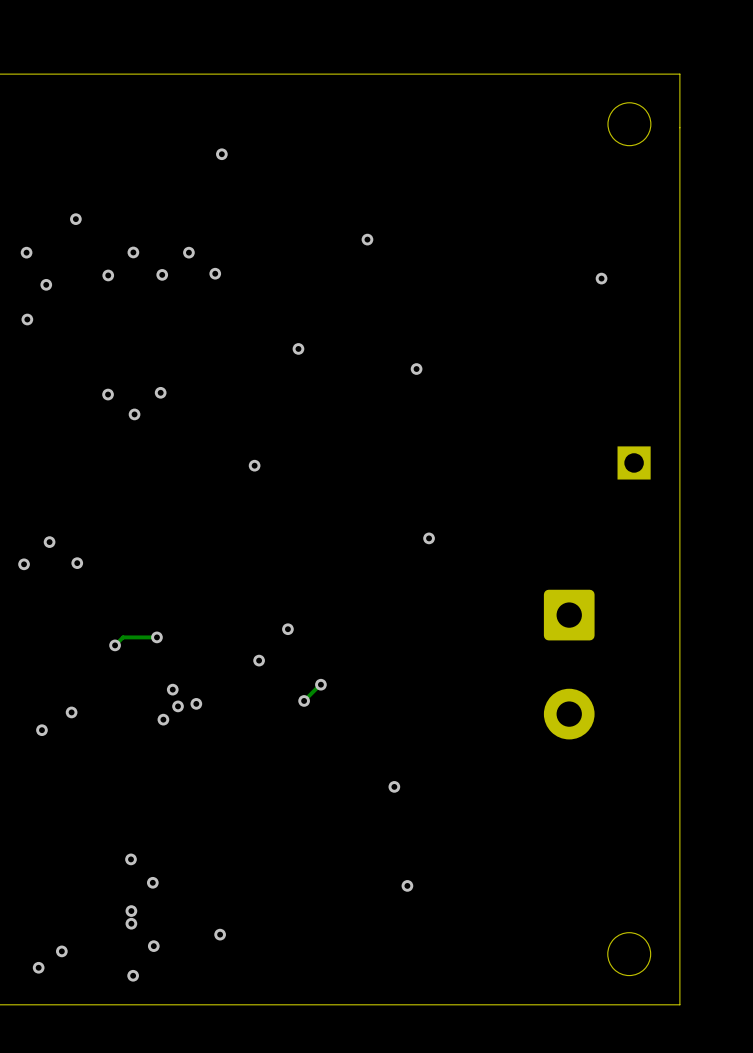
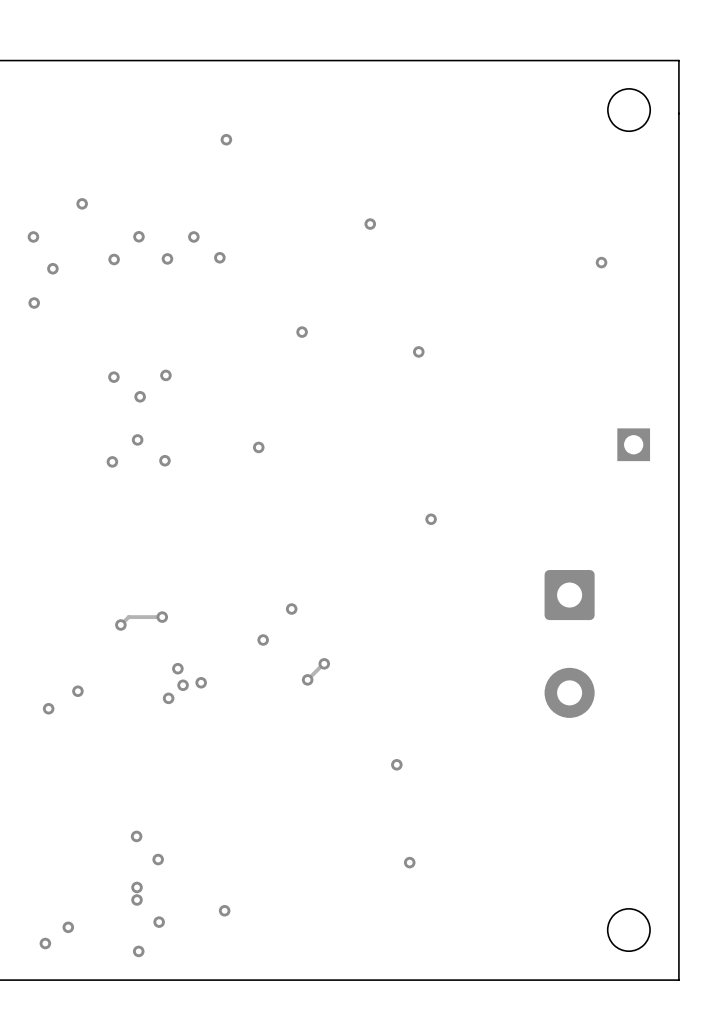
via: none -> (137, 439)
via: none -> (164, 460)
via: none -> (112, 461)
via: (49, 542) -> none
via: (77, 563) -> none
via: (24, 564) -> none

